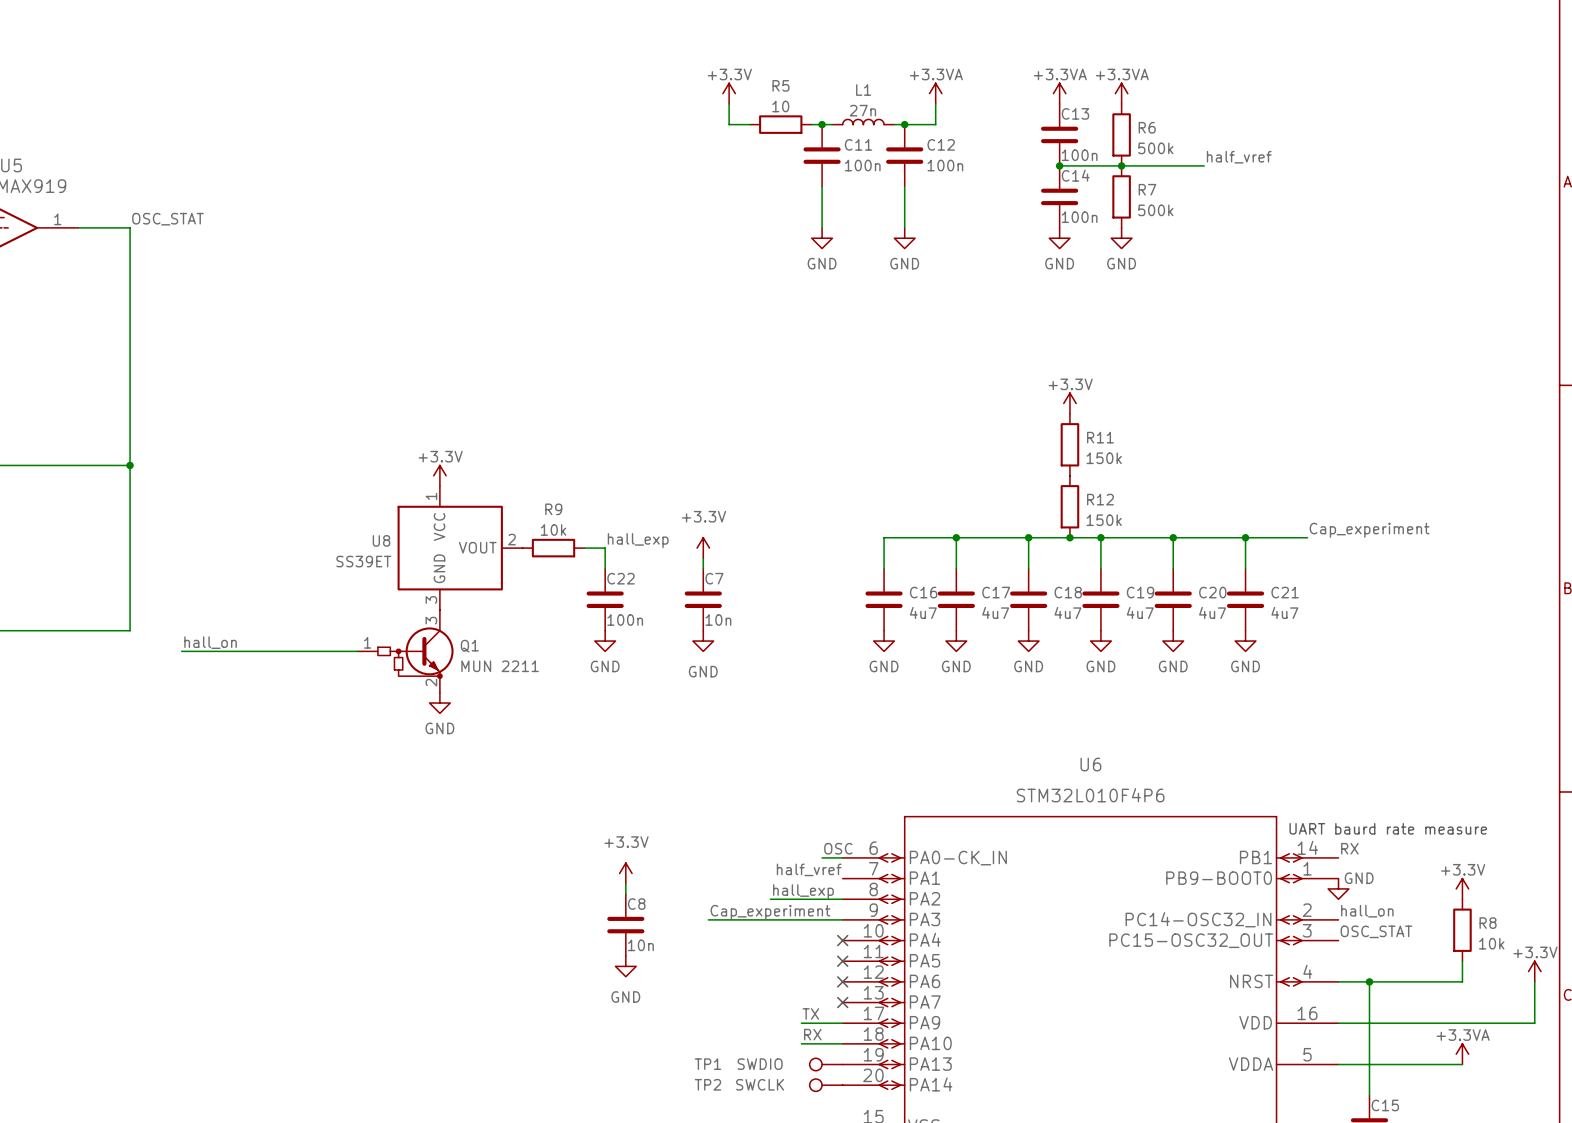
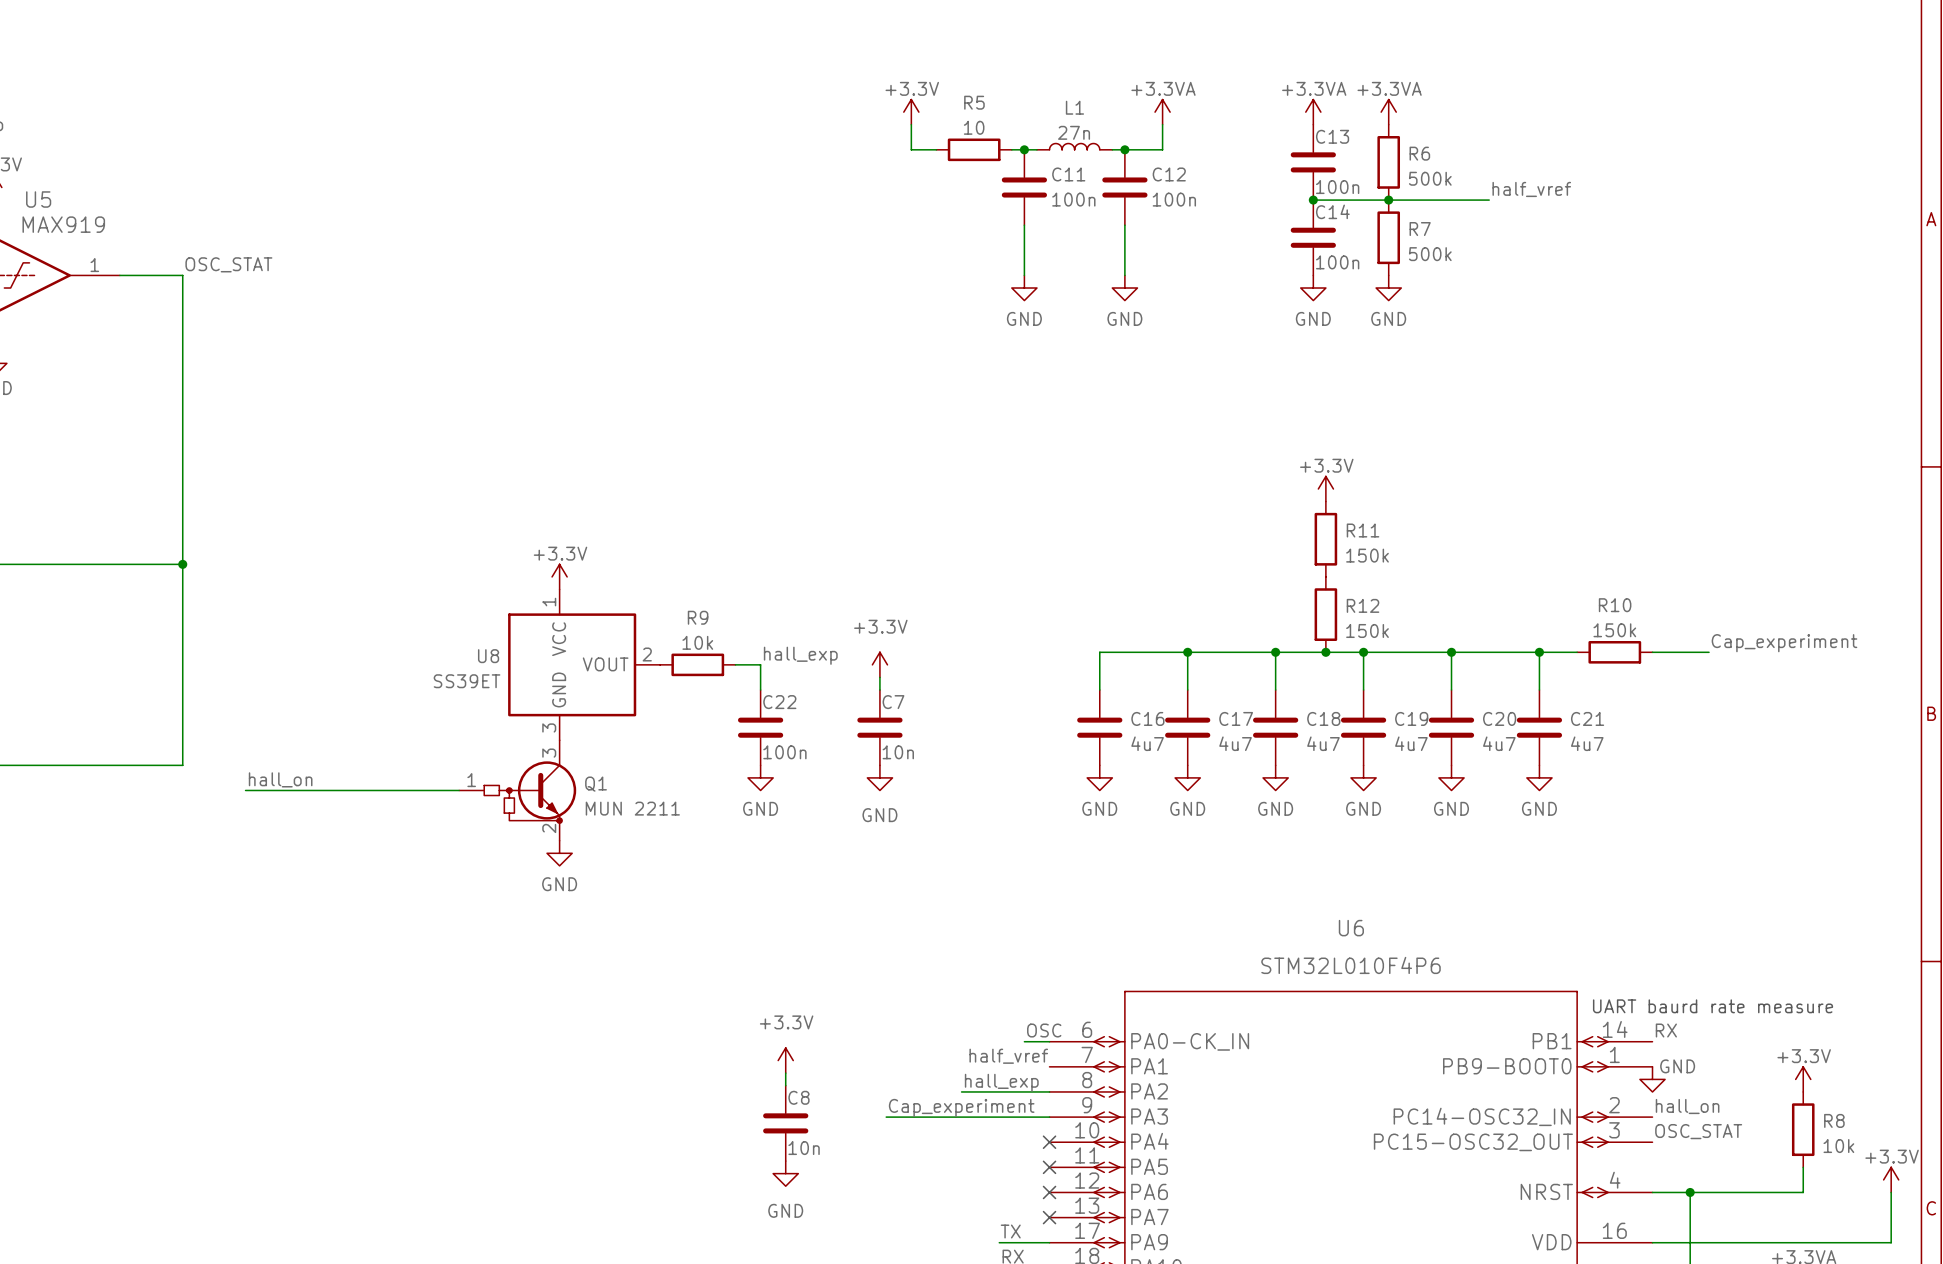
label position: Cap_experiment (1369, 530) -> Cap_experiment (1784, 643)
wire: (1276, 537) (1307, 537) -> none
R10: none -> 150k (1614, 652)
wire: none -> (1652, 652) (1709, 652)

